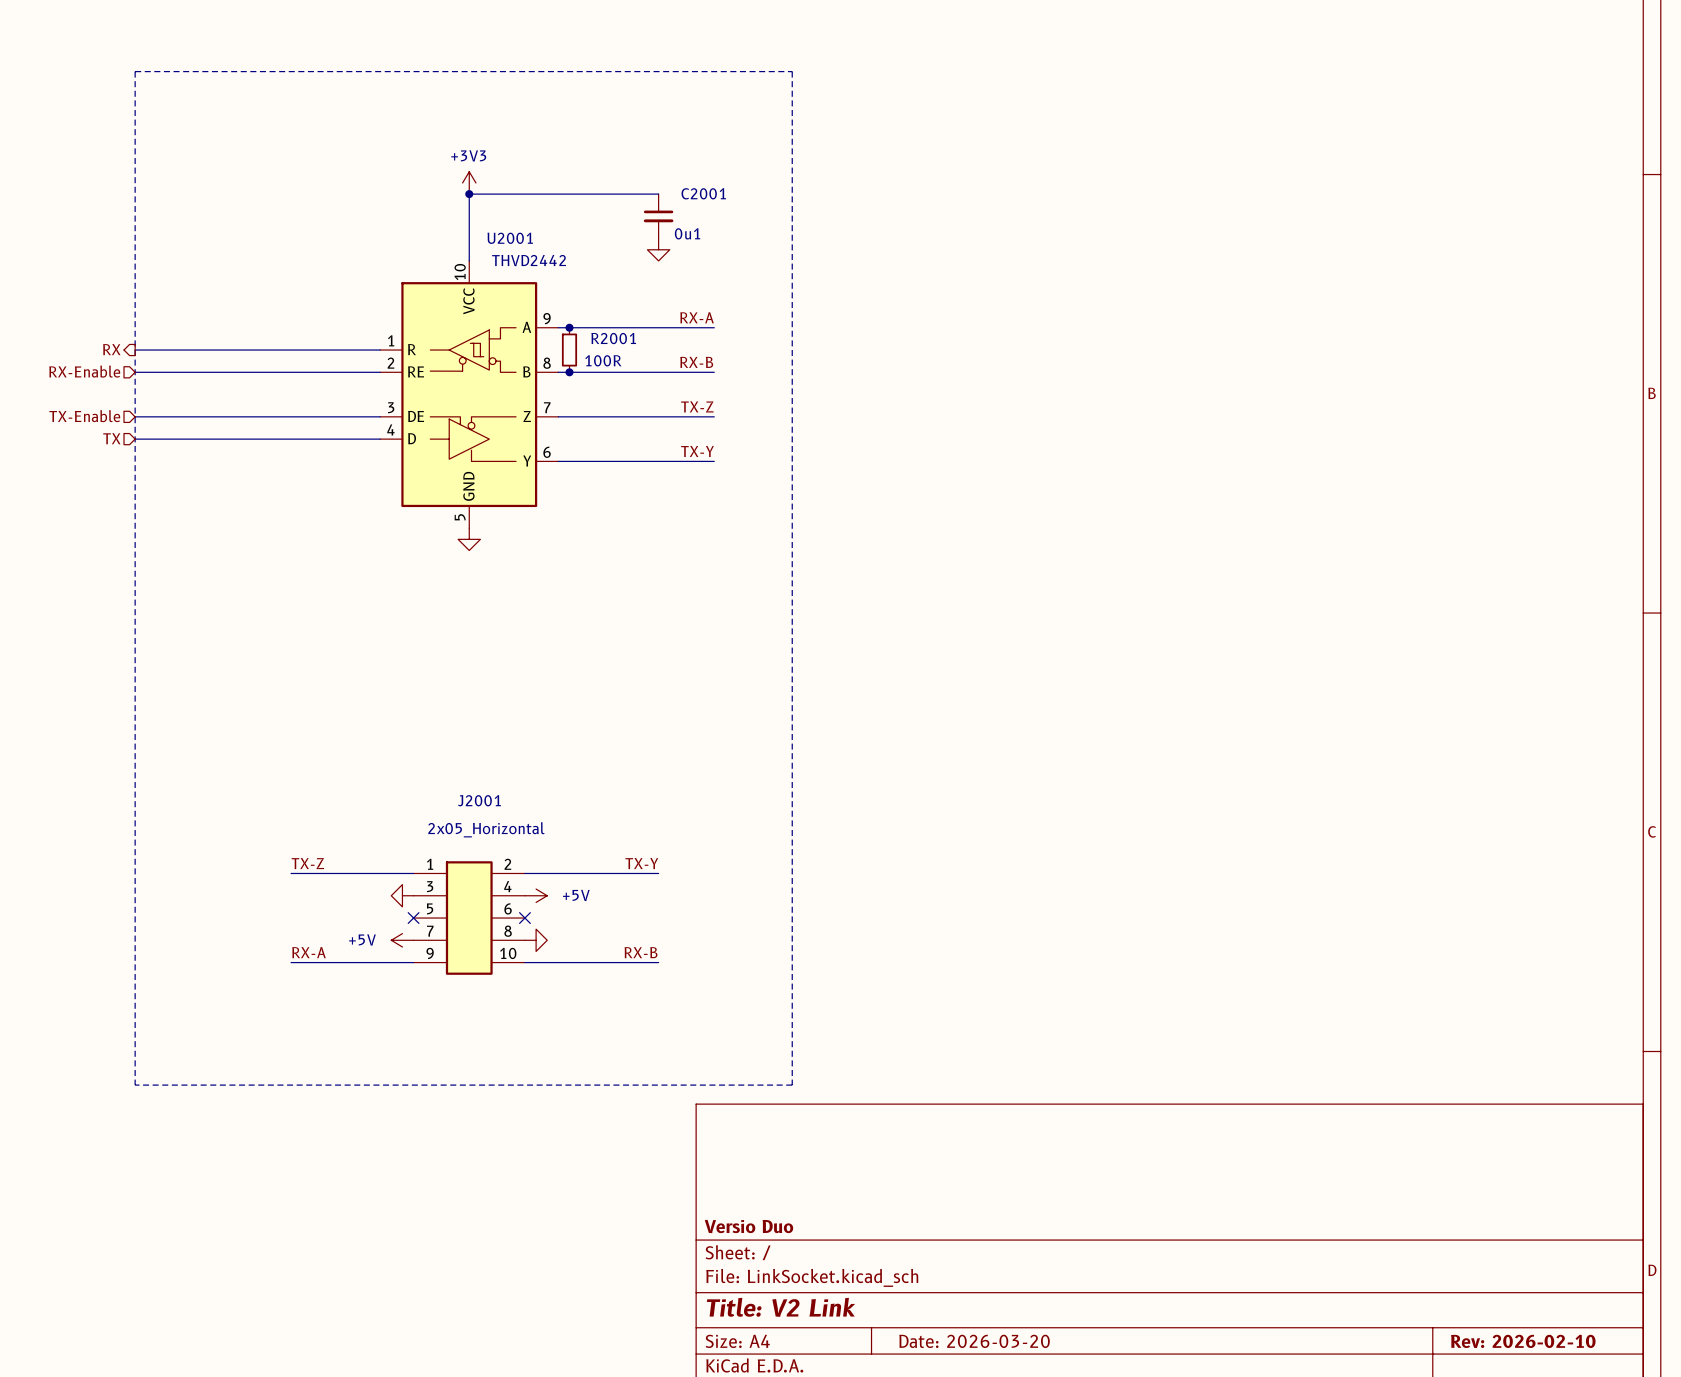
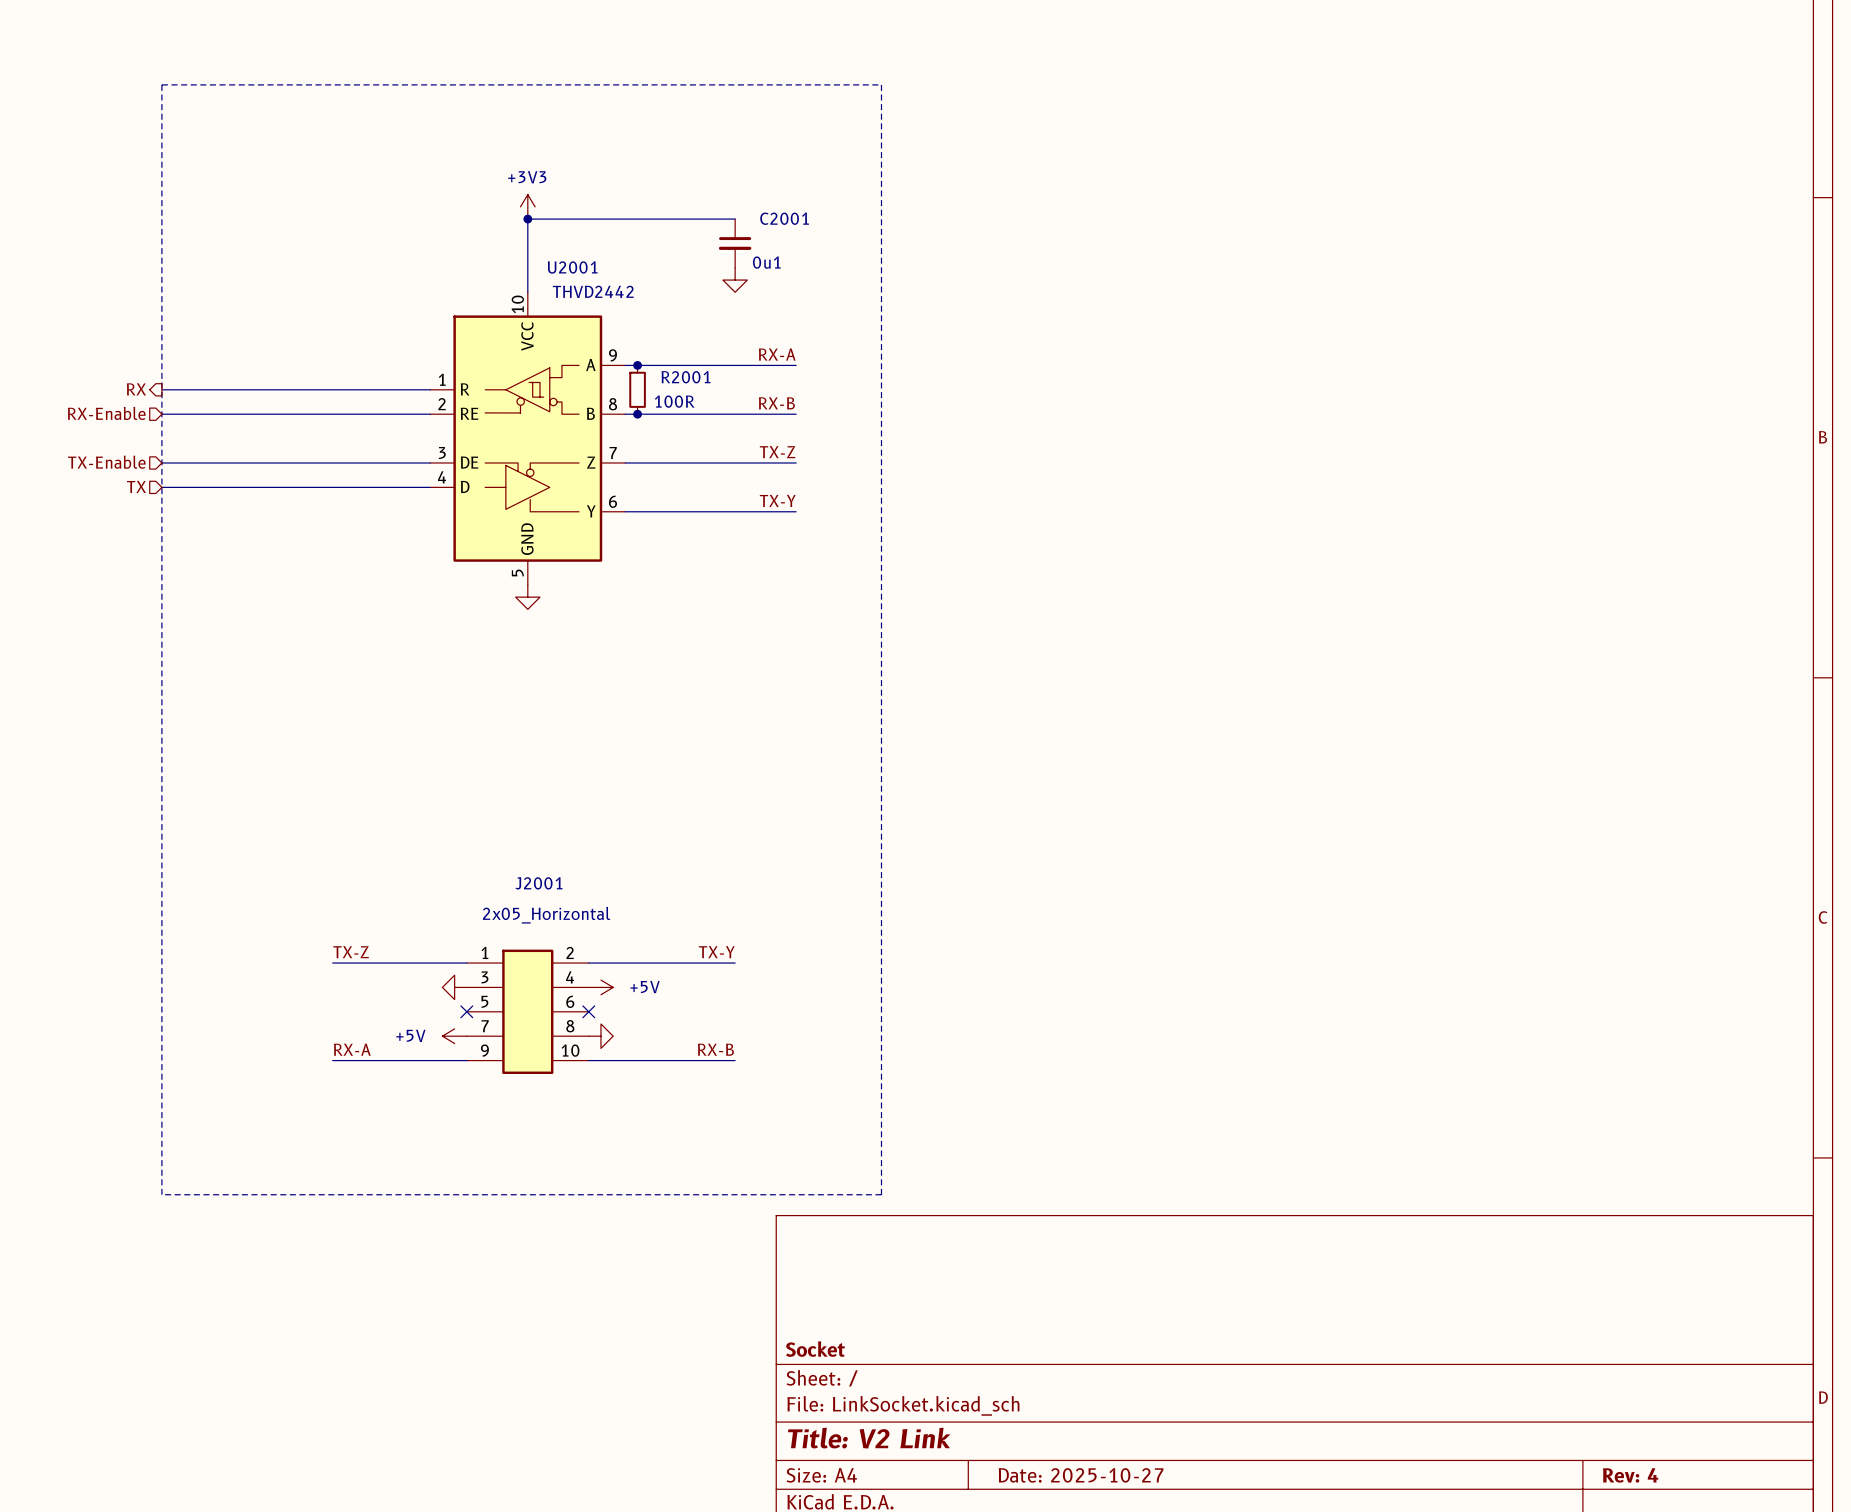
title block: Versio Duo (748, 1226) -> Socket (815, 1349)
title block: Date: 2026-03-20 (974, 1341) -> Date: 2025-10-27 (1081, 1475)
title block: Rev: 2026-02-10 (1523, 1341) -> Rev: 4 (1630, 1475)

